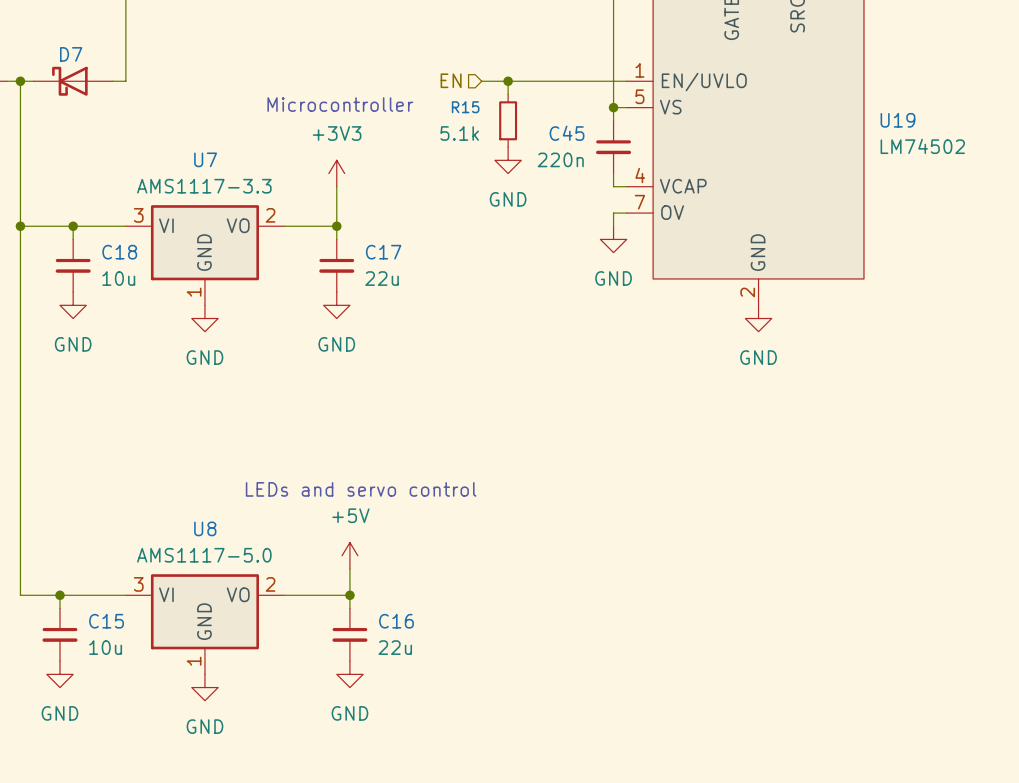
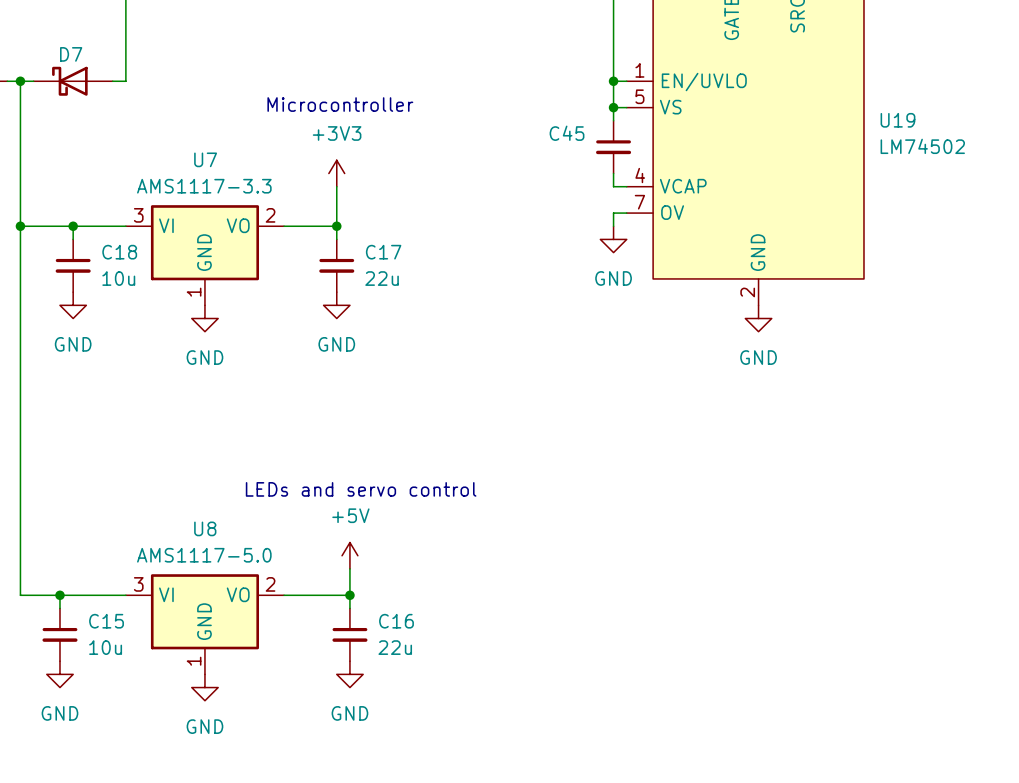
hierarchical label: EN (451, 80) -> none
wire: (481, 81) (613, 81) -> none
wire: (508, 81) (508, 94) -> none
junction: (508, 81) -> none
junction: none -> (613, 81)
R15: 5.1k (508, 120) -> none
C45 value: 220n (560, 159) -> none
power symbol: GND (508, 160) -> none

